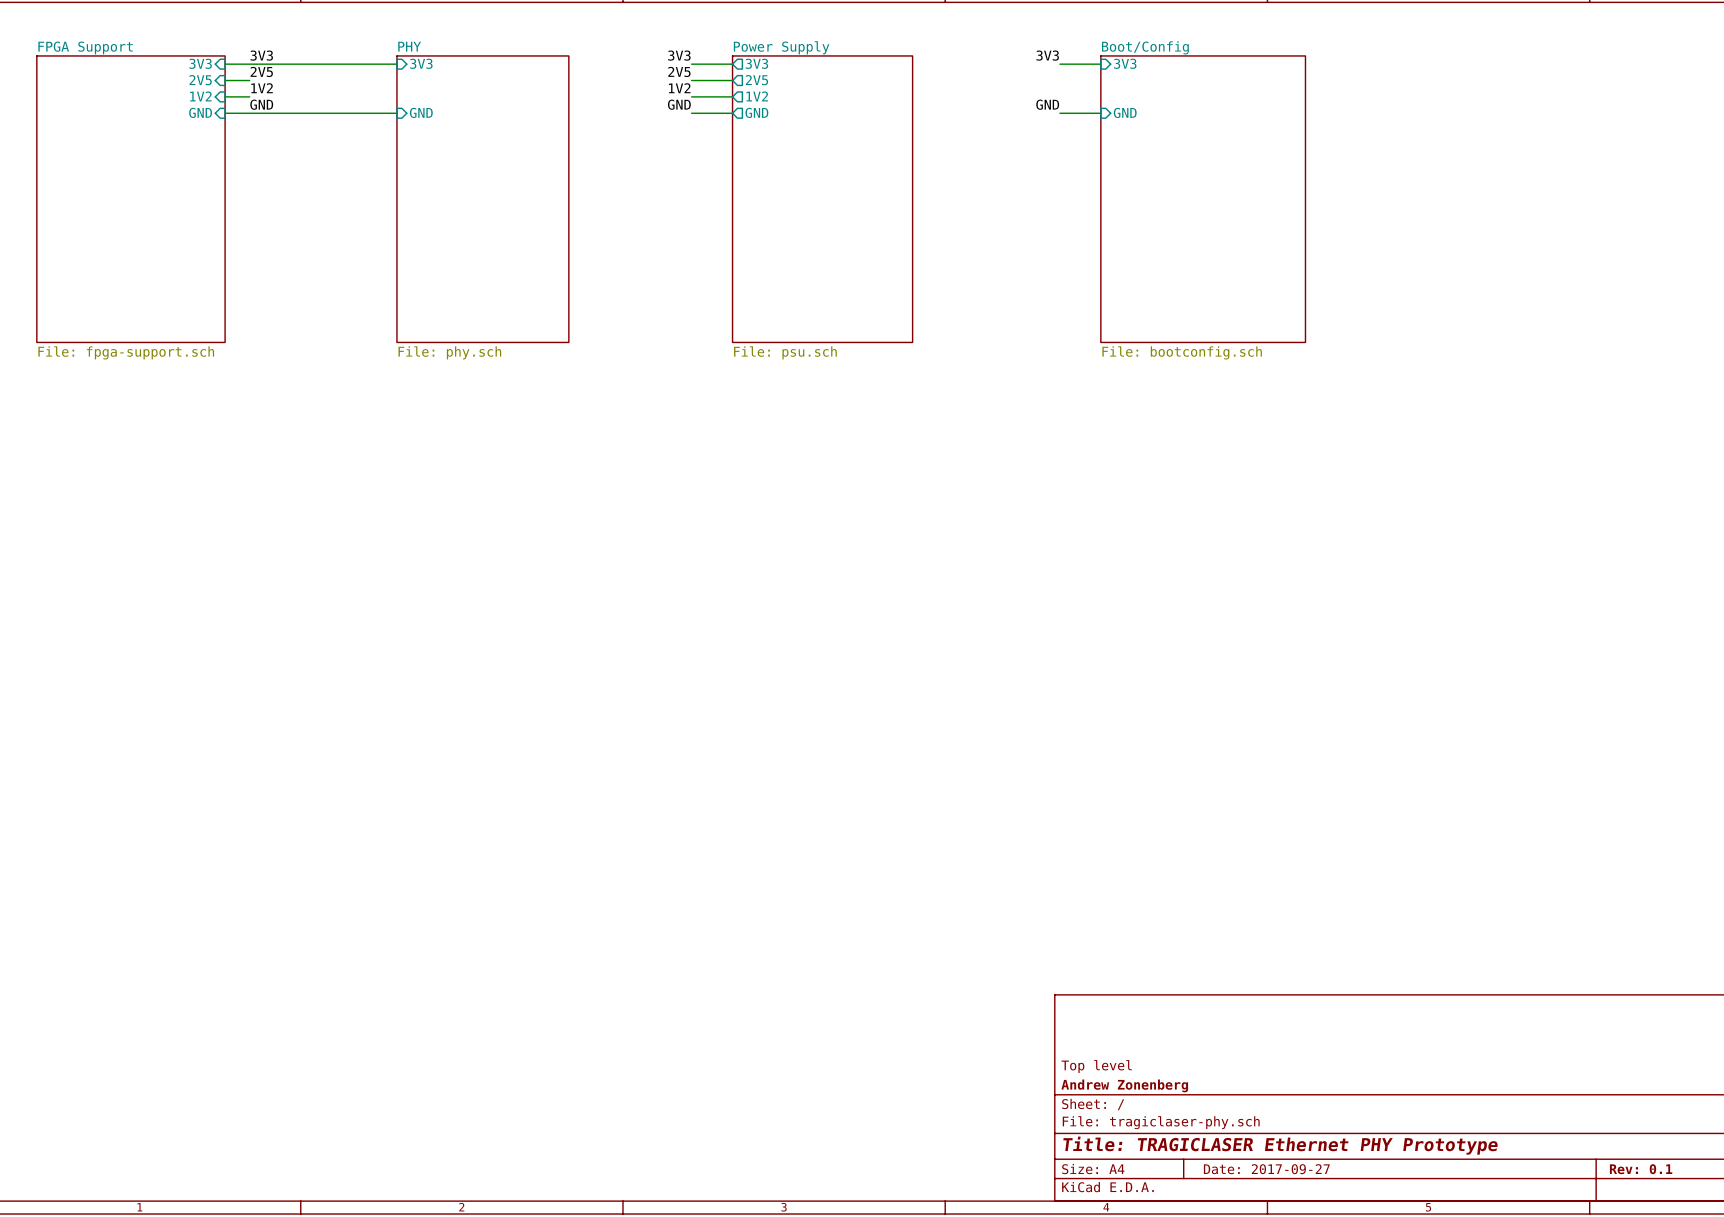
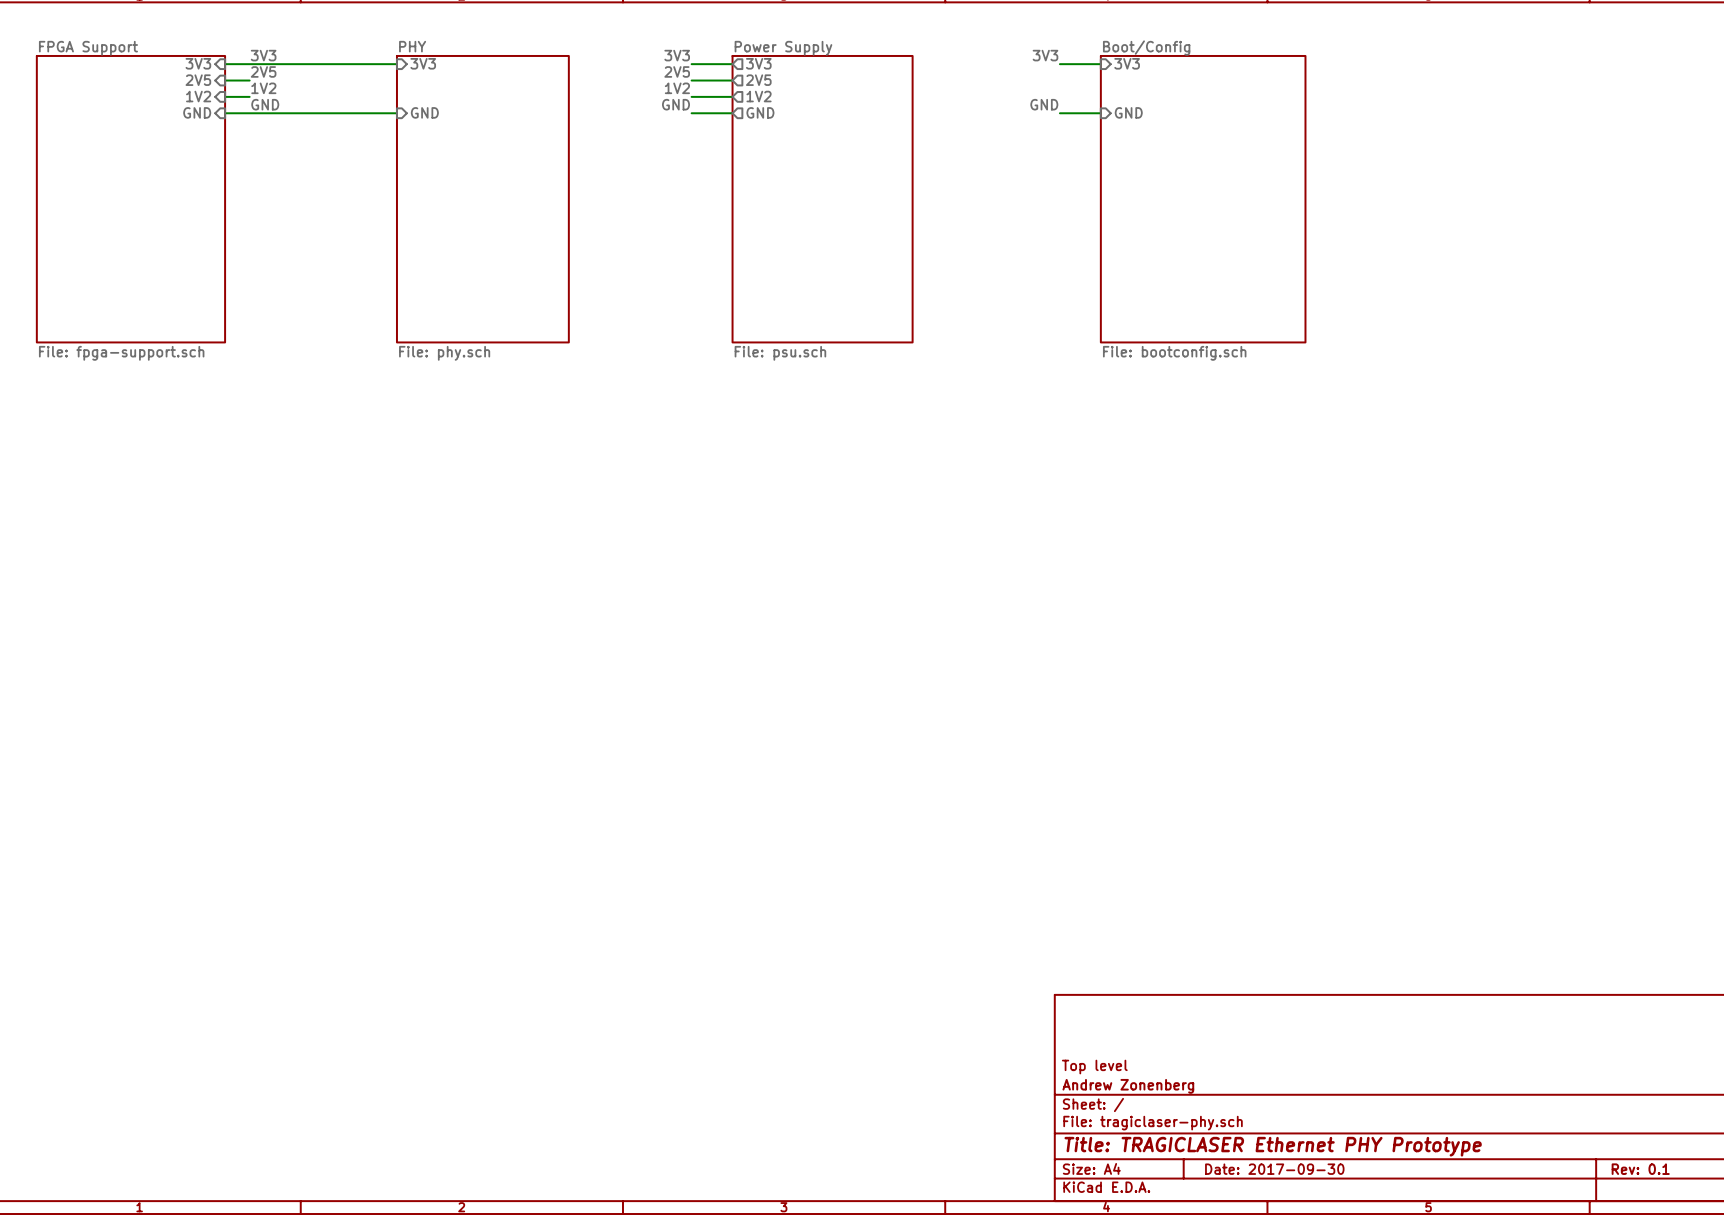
title block: Date: 2017-09-27 (1266, 1169) -> Date: 2017-09-30 (1274, 1169)

